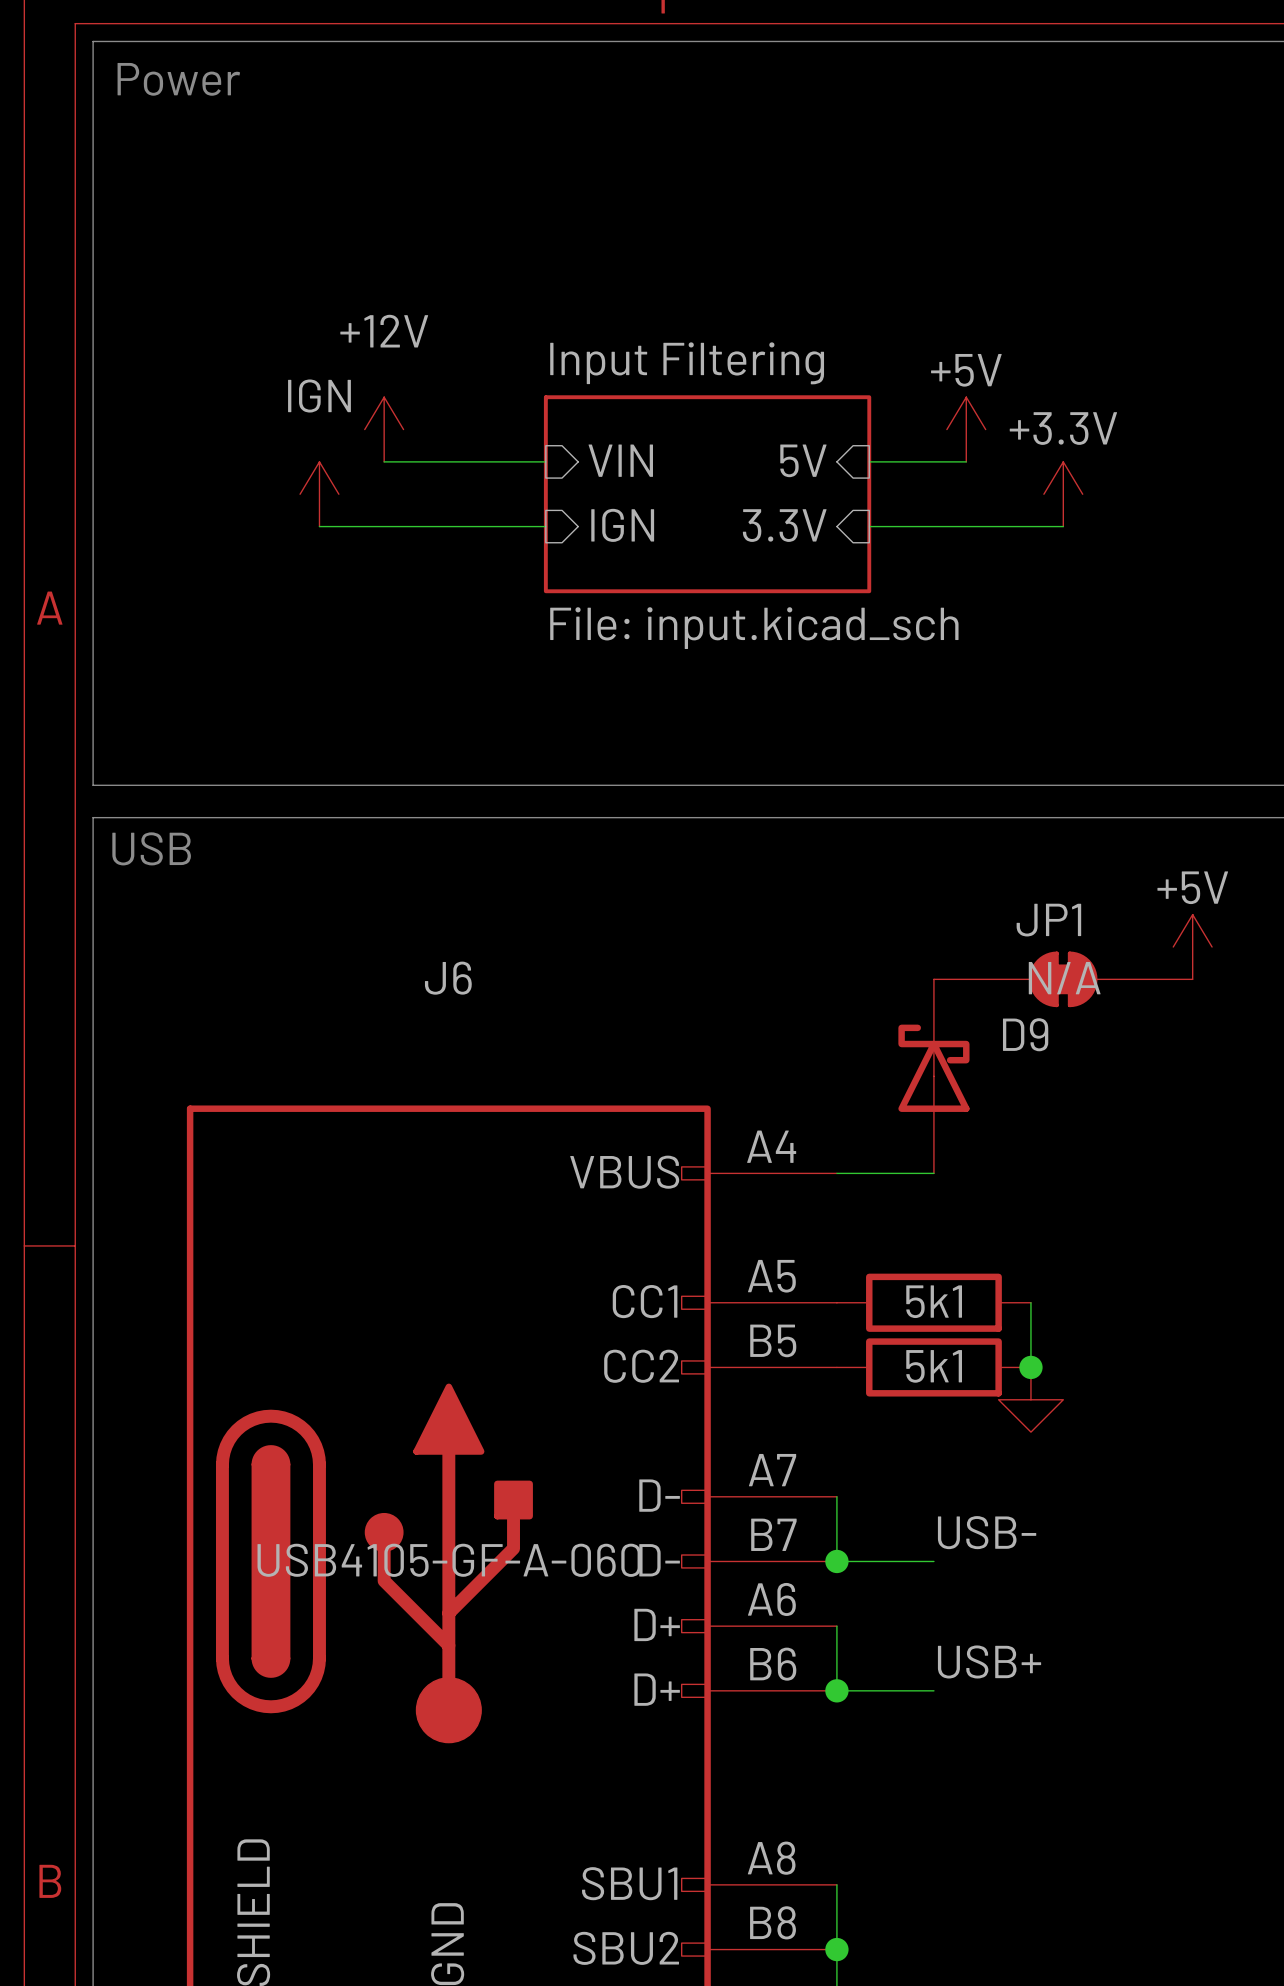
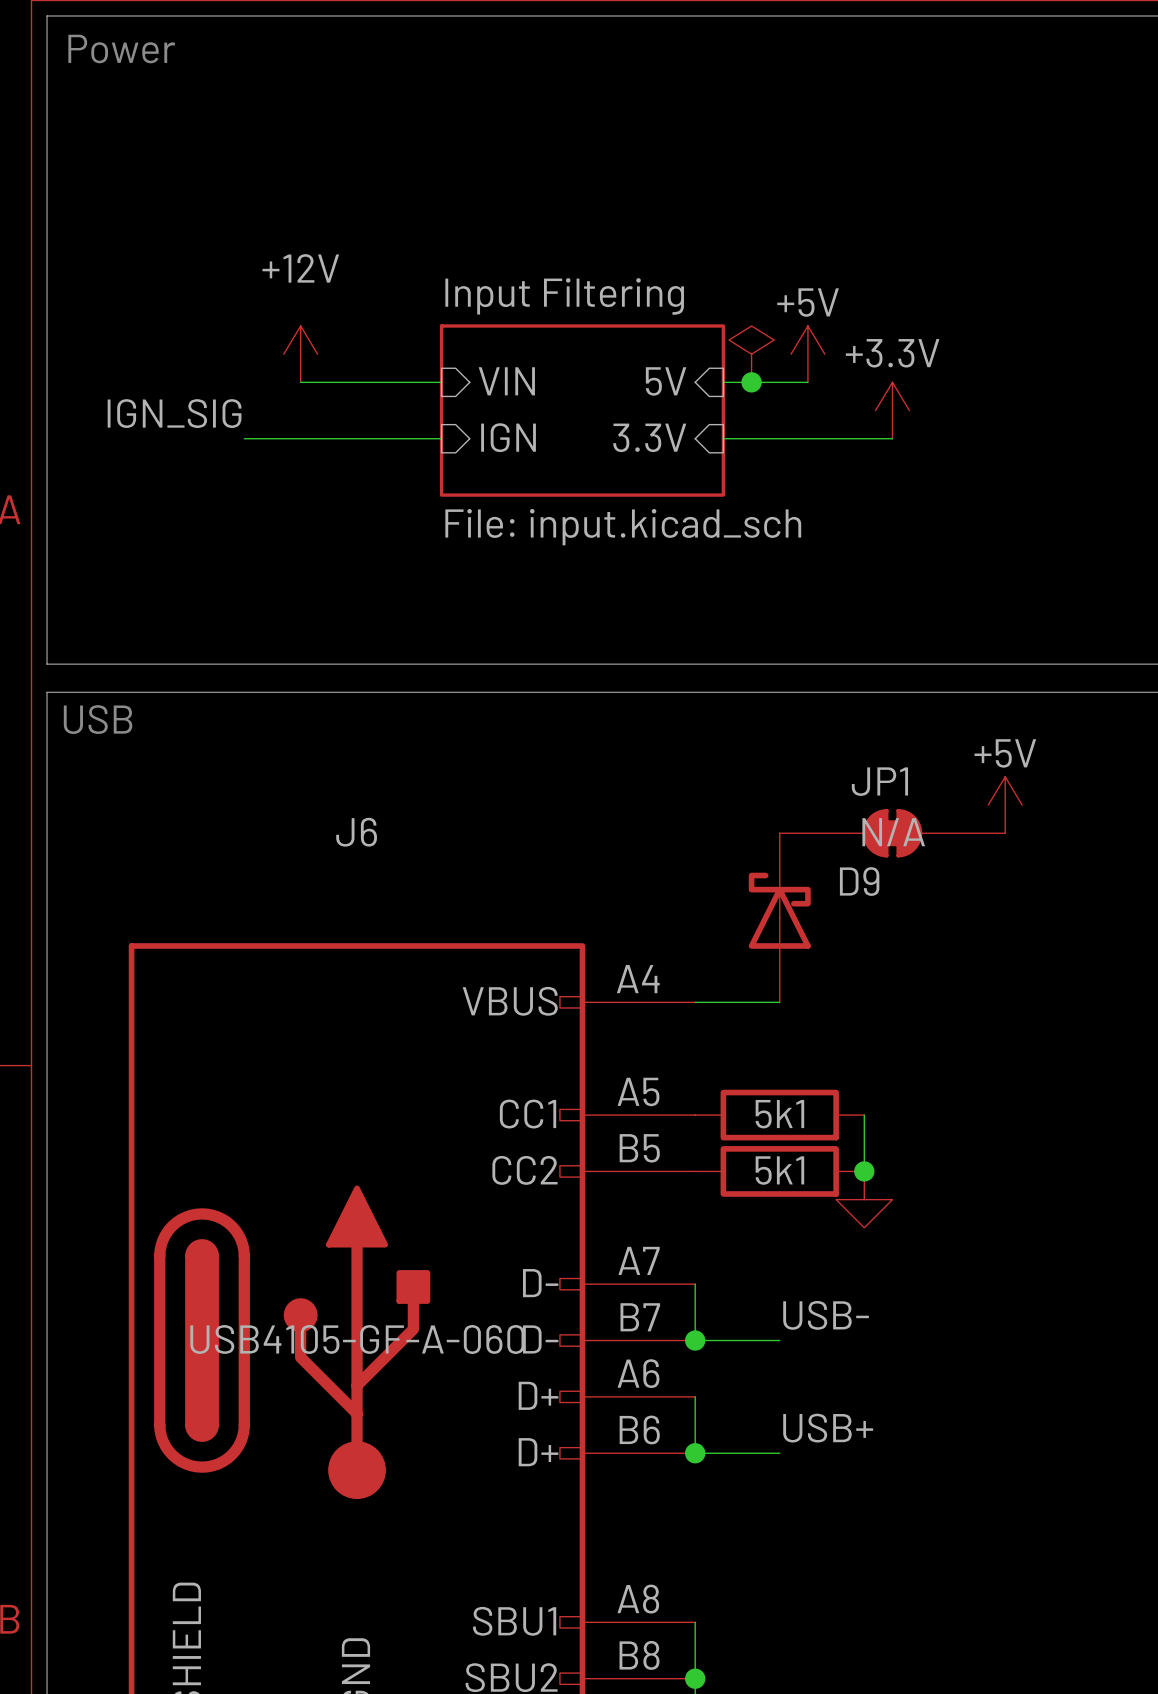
power symbol: none -> (751, 354)
junction: none -> (751, 382)
power symbol: IGN (319, 494) -> none
label: none -> IGN_SIG (174, 413)

